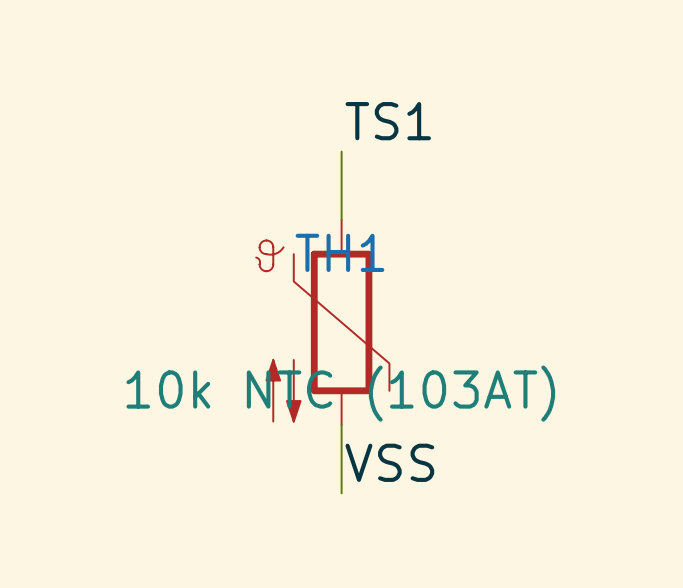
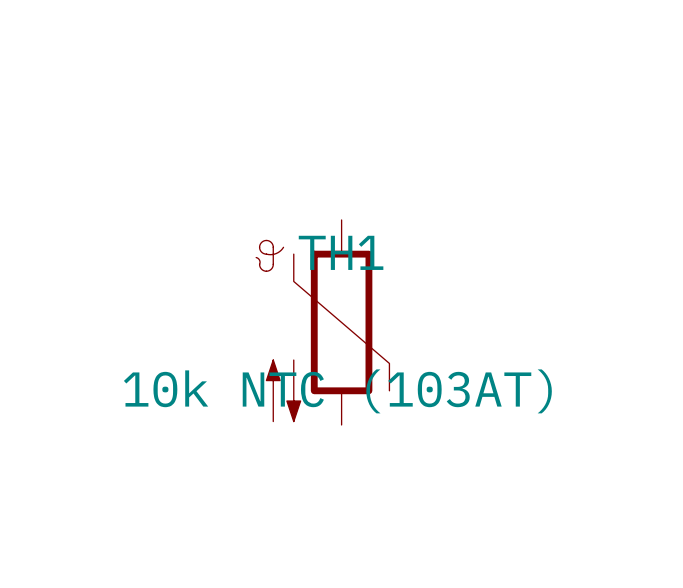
label: TS1 (388, 121) -> none
wire: (341, 151) (341, 219) -> none
wire: (341, 424) (341, 493) -> none
label: VSS (389, 462) -> none

